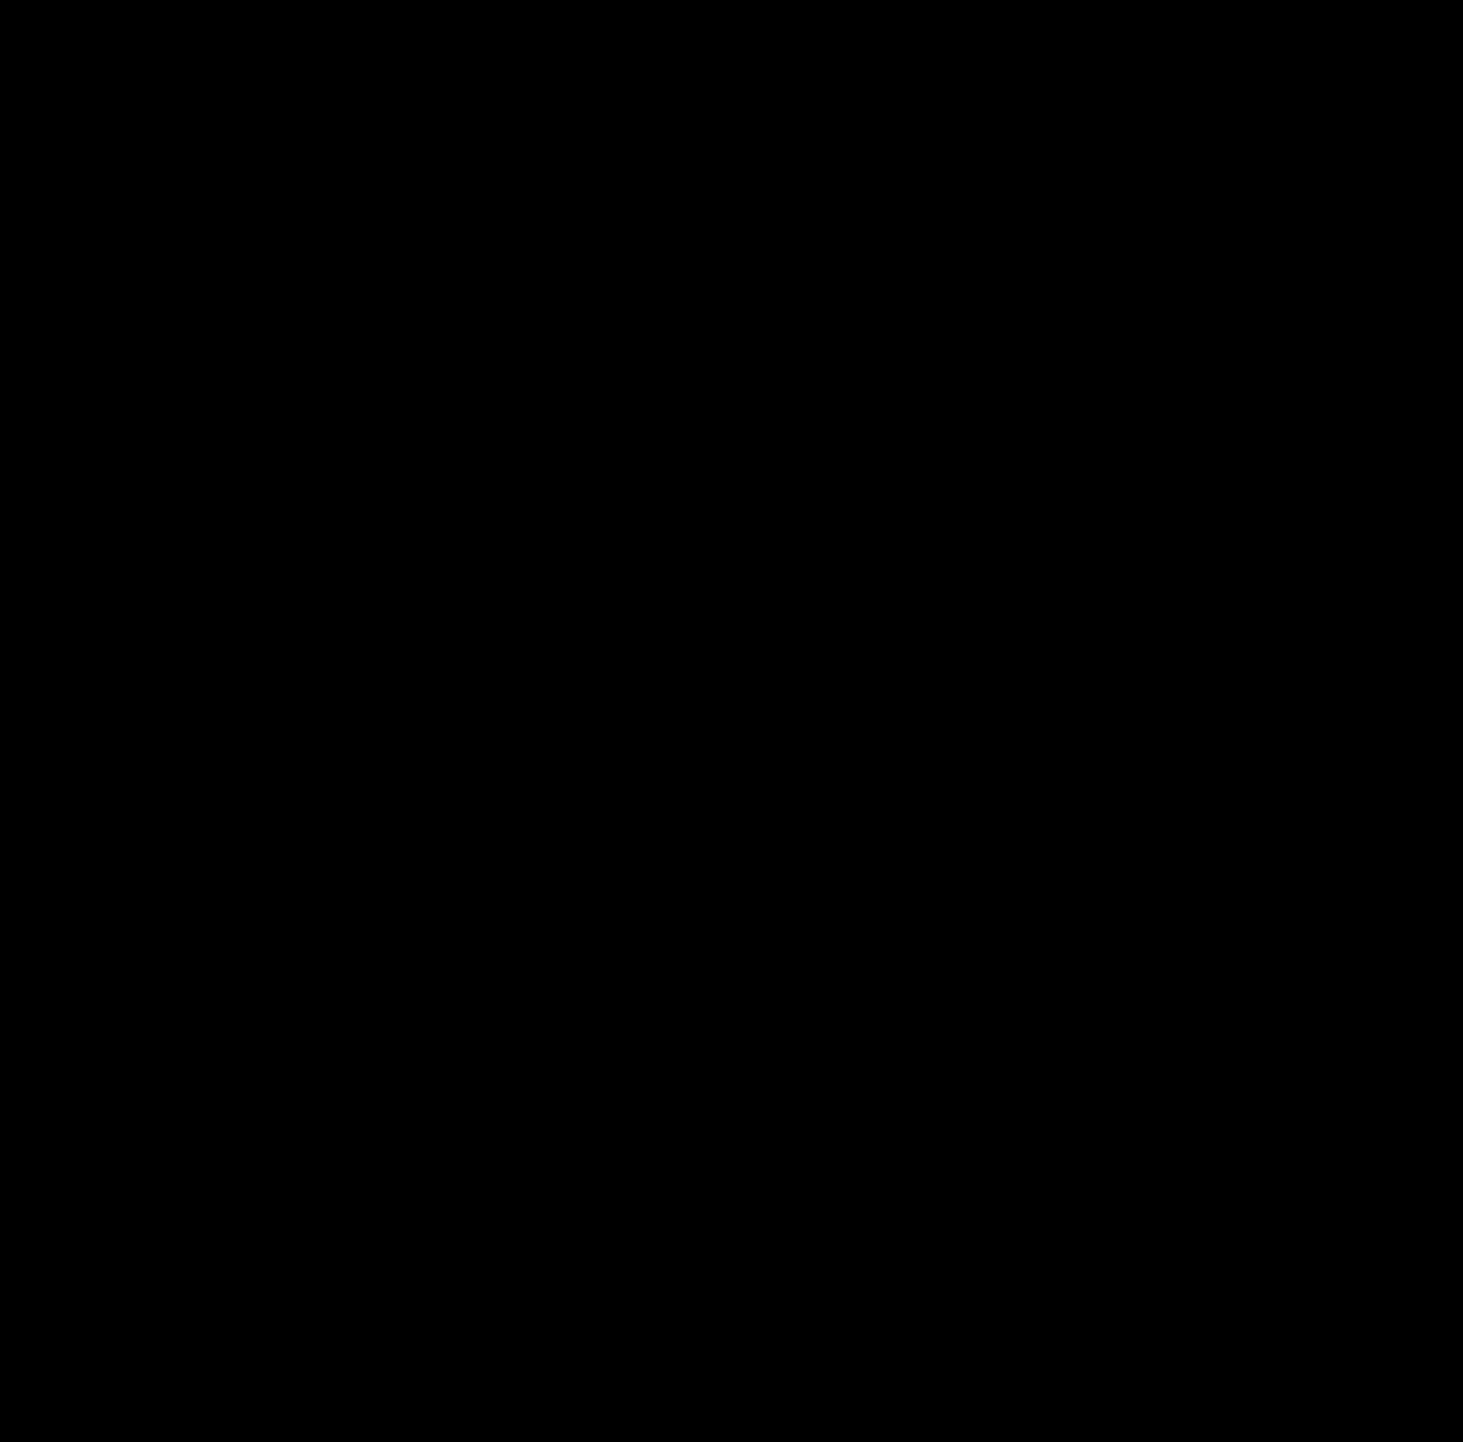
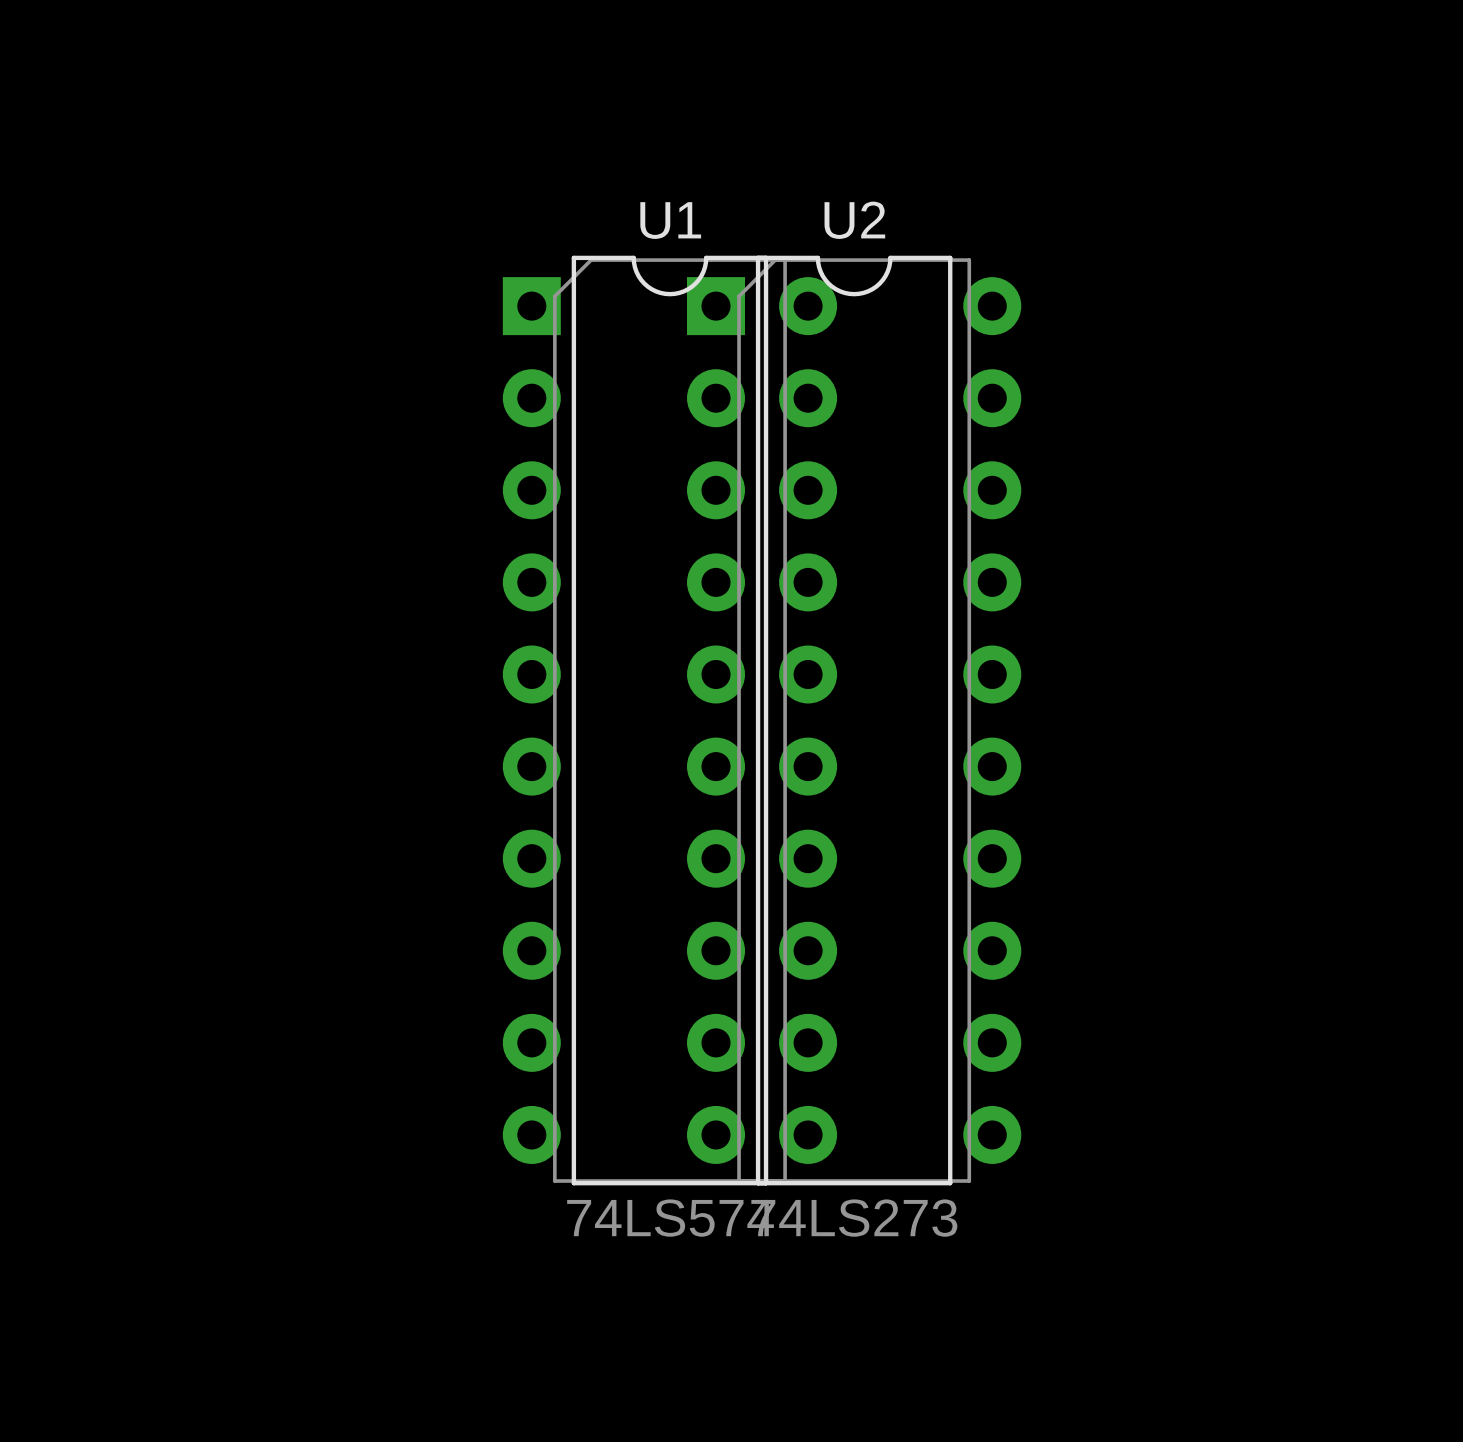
U1: none -> 74LS574 (669, 720)
U2: none -> 74LS273 (854, 720)

